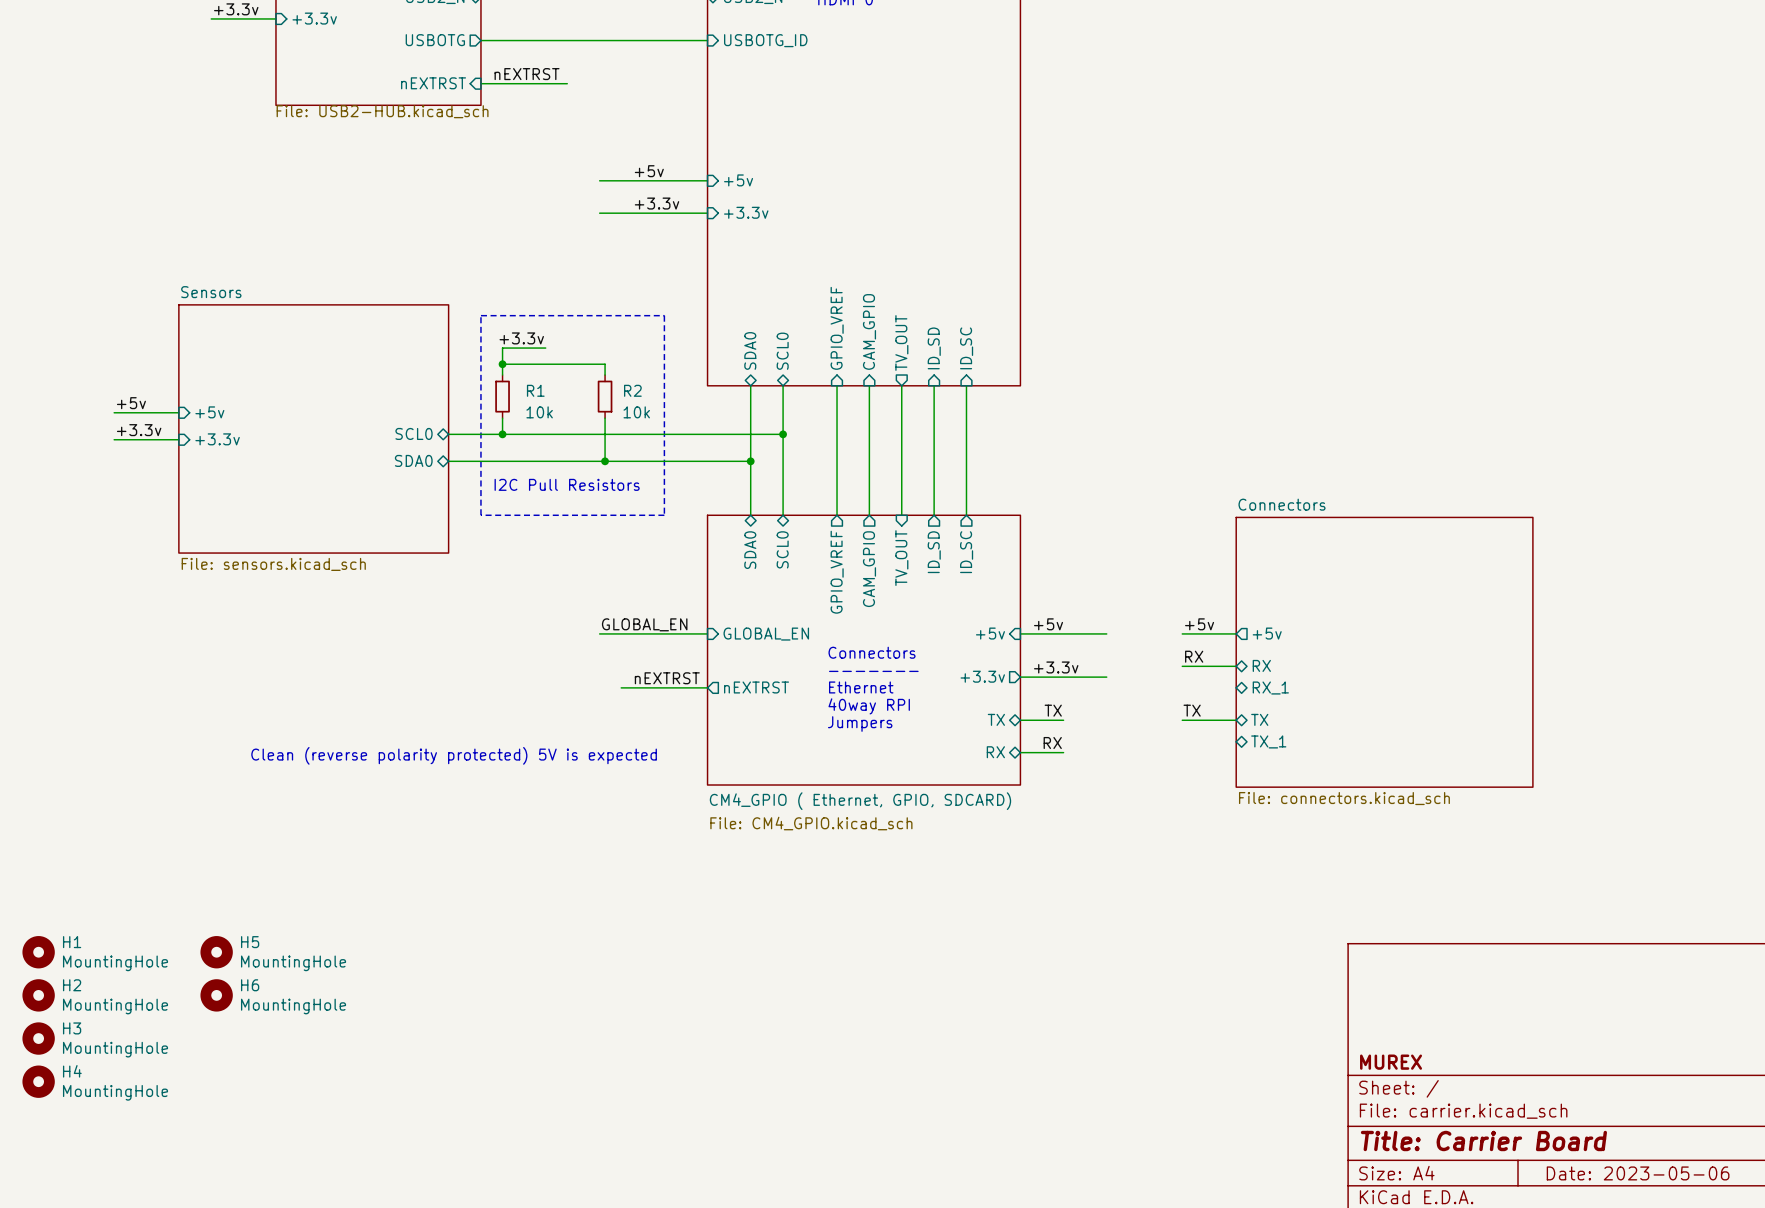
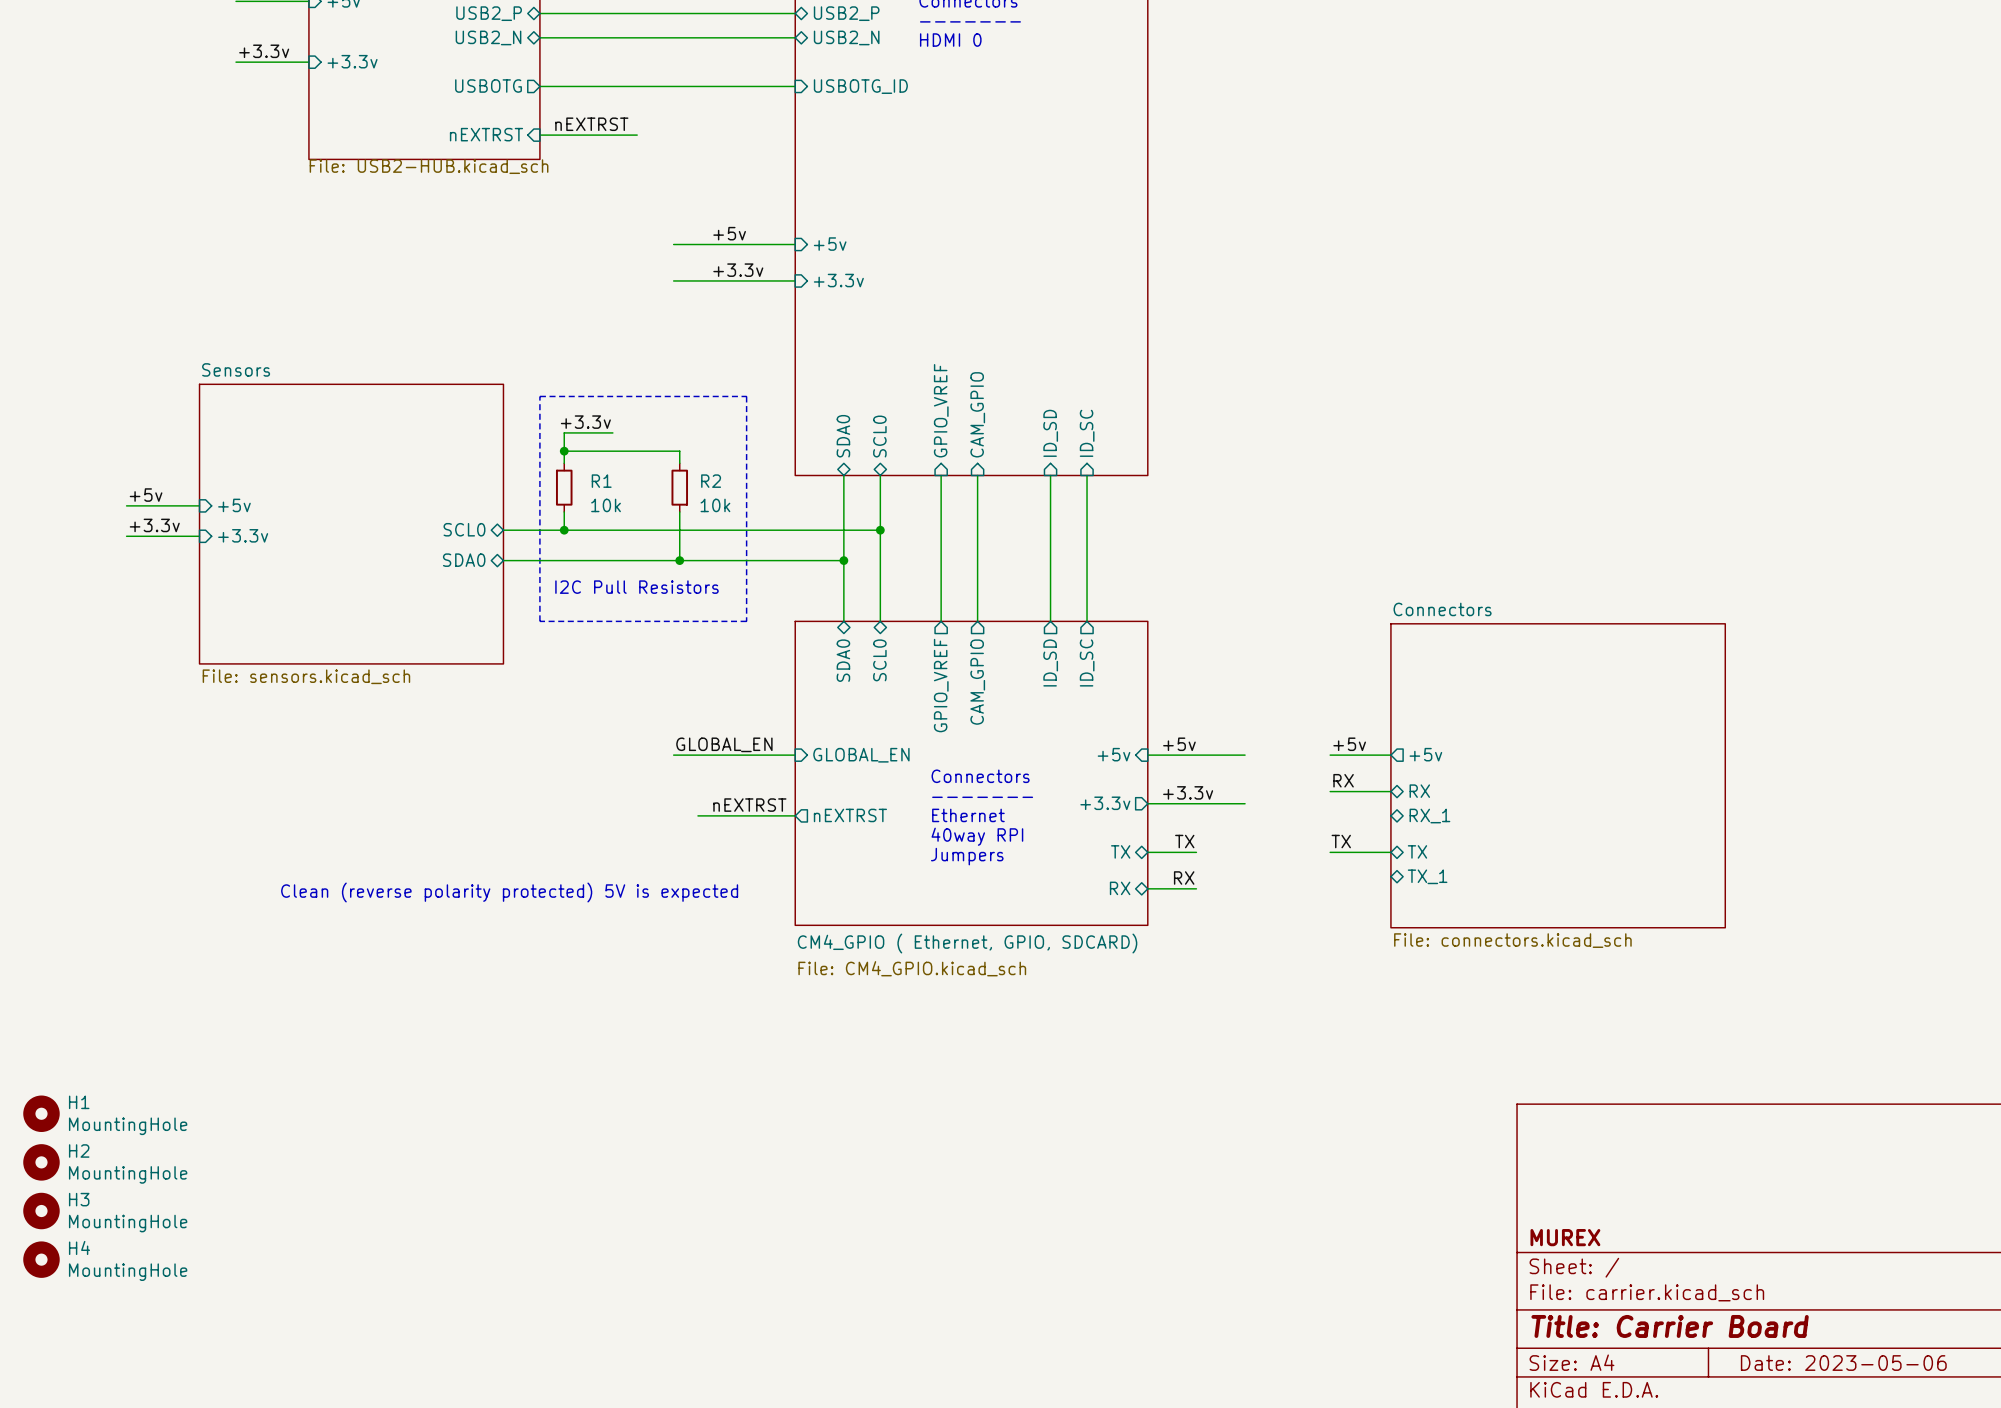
sheet pin: TV_OUT (901, 342) -> none
wire: (901, 385) (901, 515) -> none
sheet pin: TV_OUT (901, 558) -> none
H5: MountingHole (216, 952) -> none
H6: MountingHole (216, 995) -> none

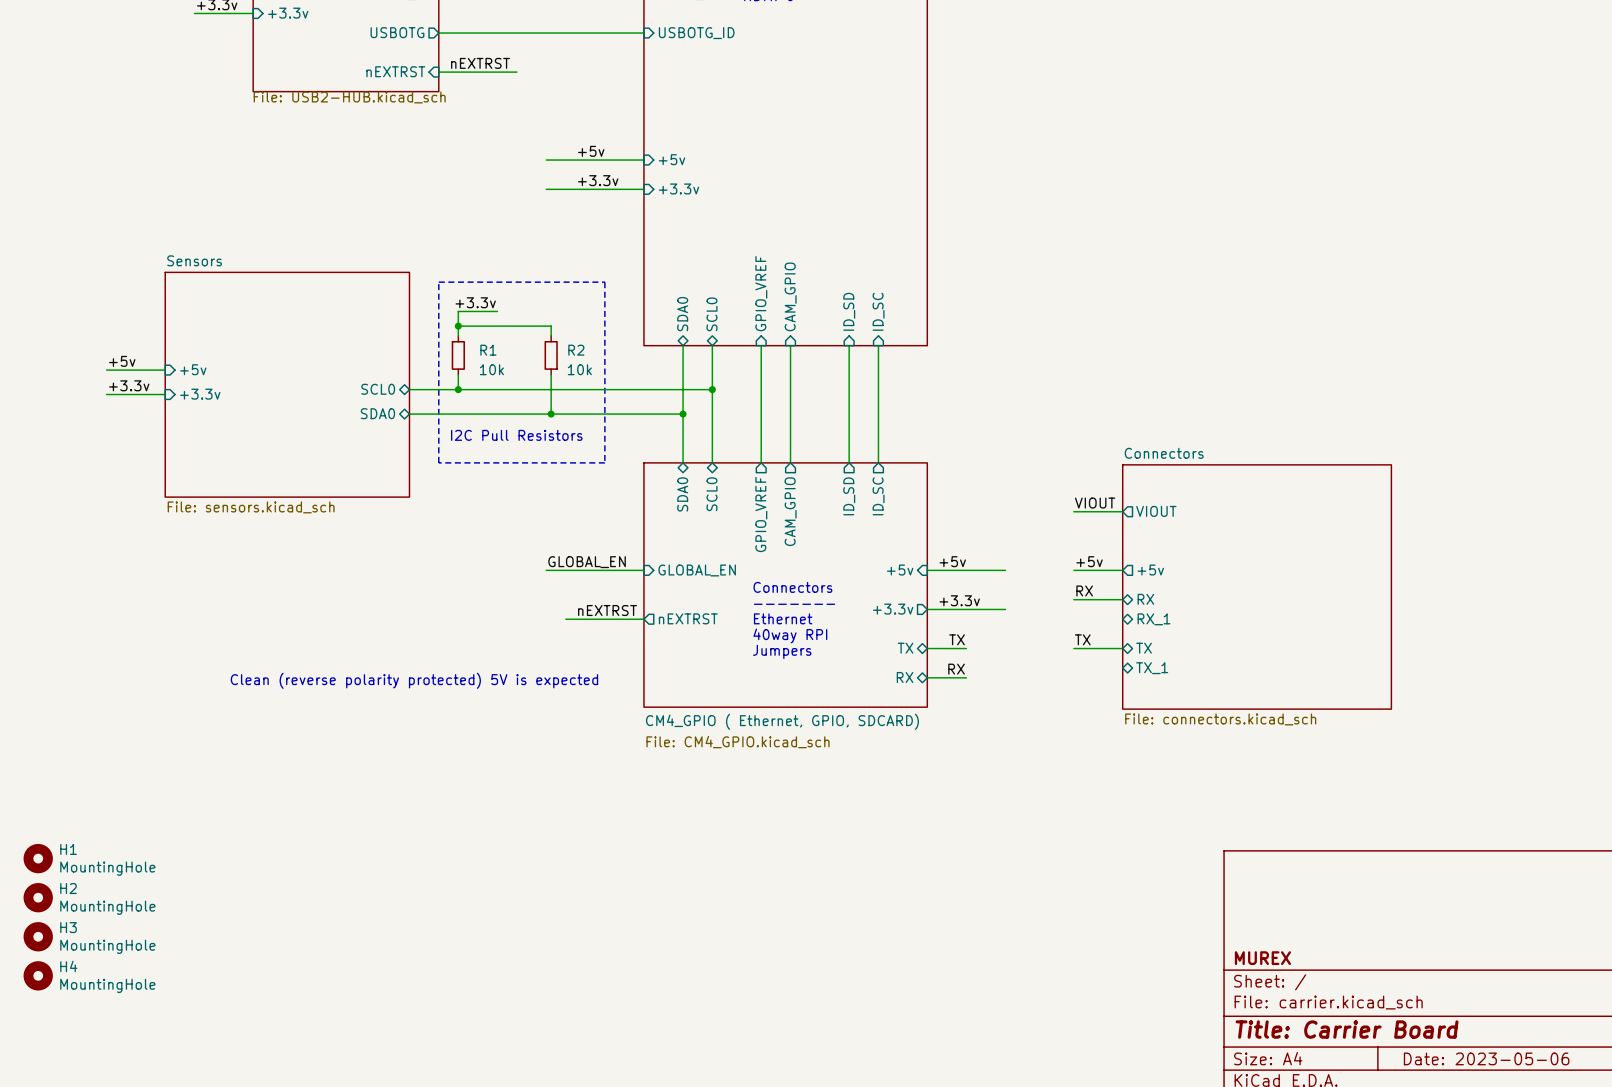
label: none -> VIOUT (1095, 503)
sheet pin: none -> VIOUT (1156, 511)
wire: none -> (1073, 511) (1122, 511)

